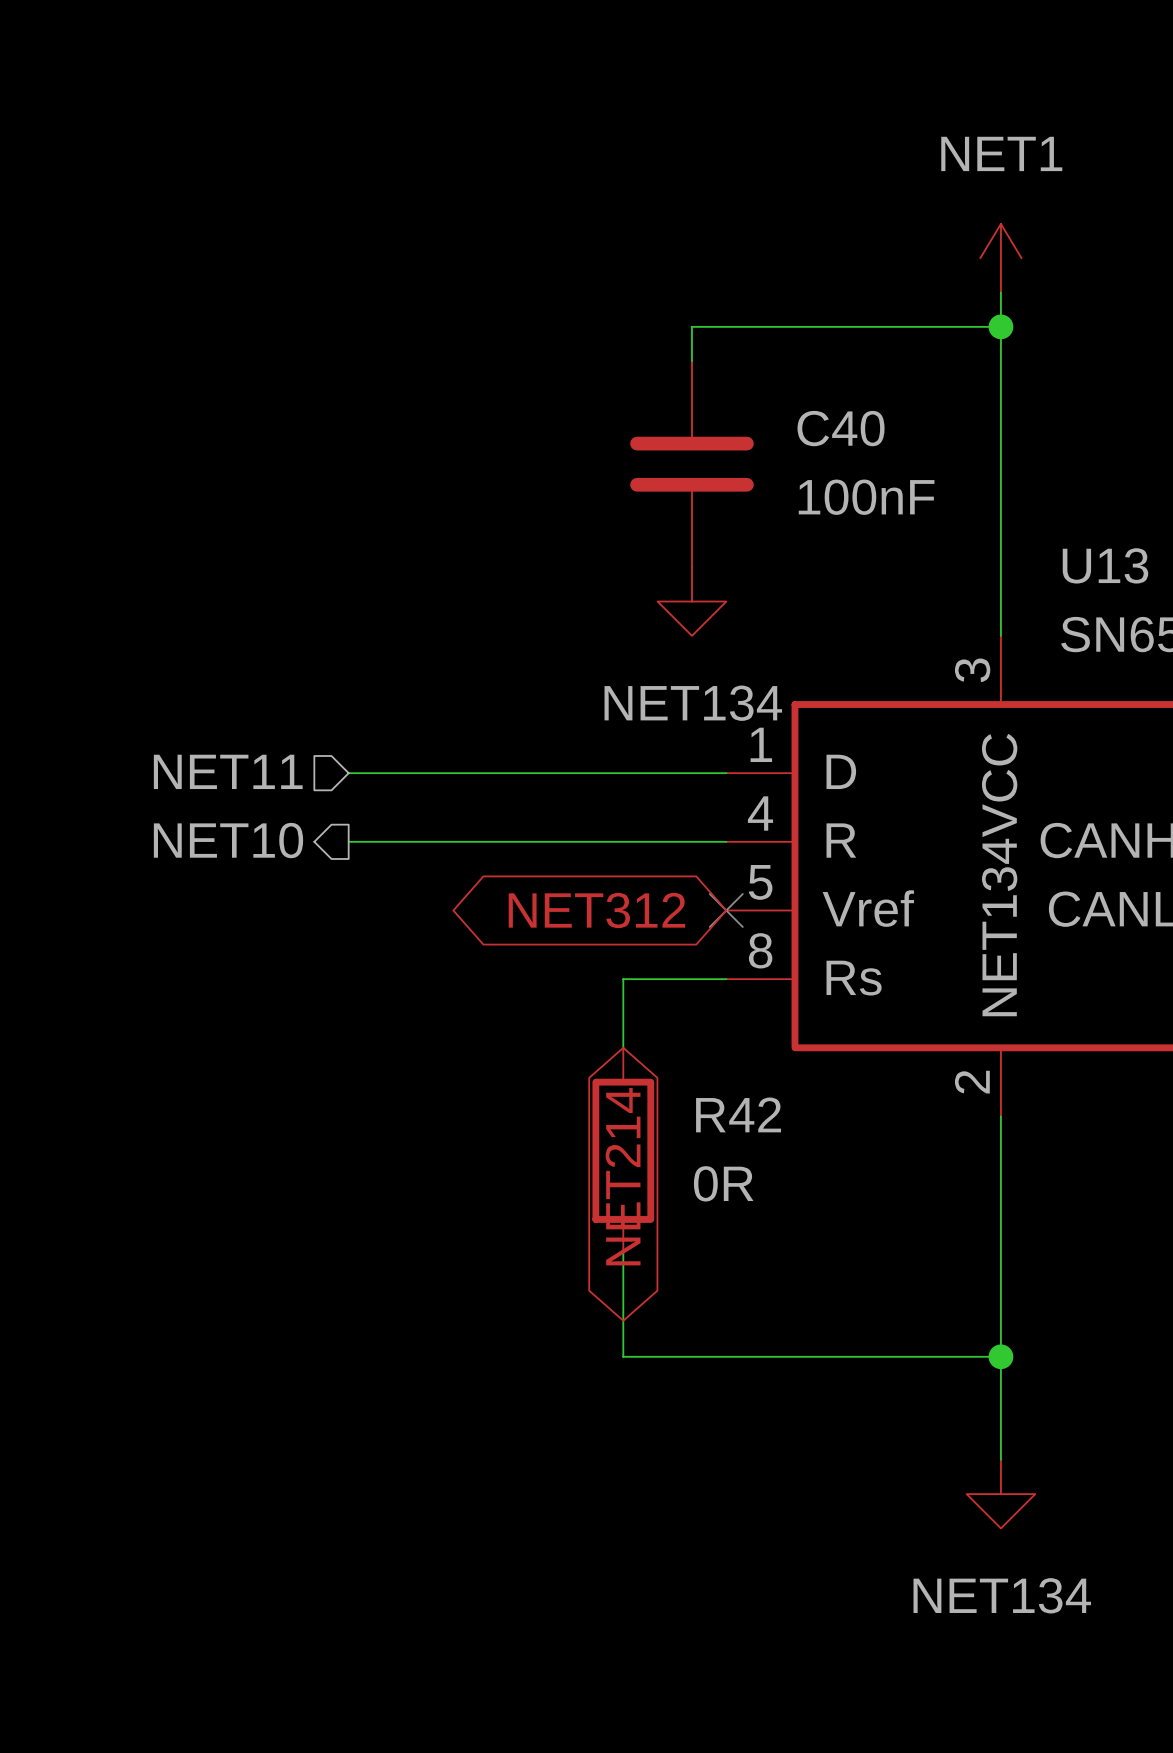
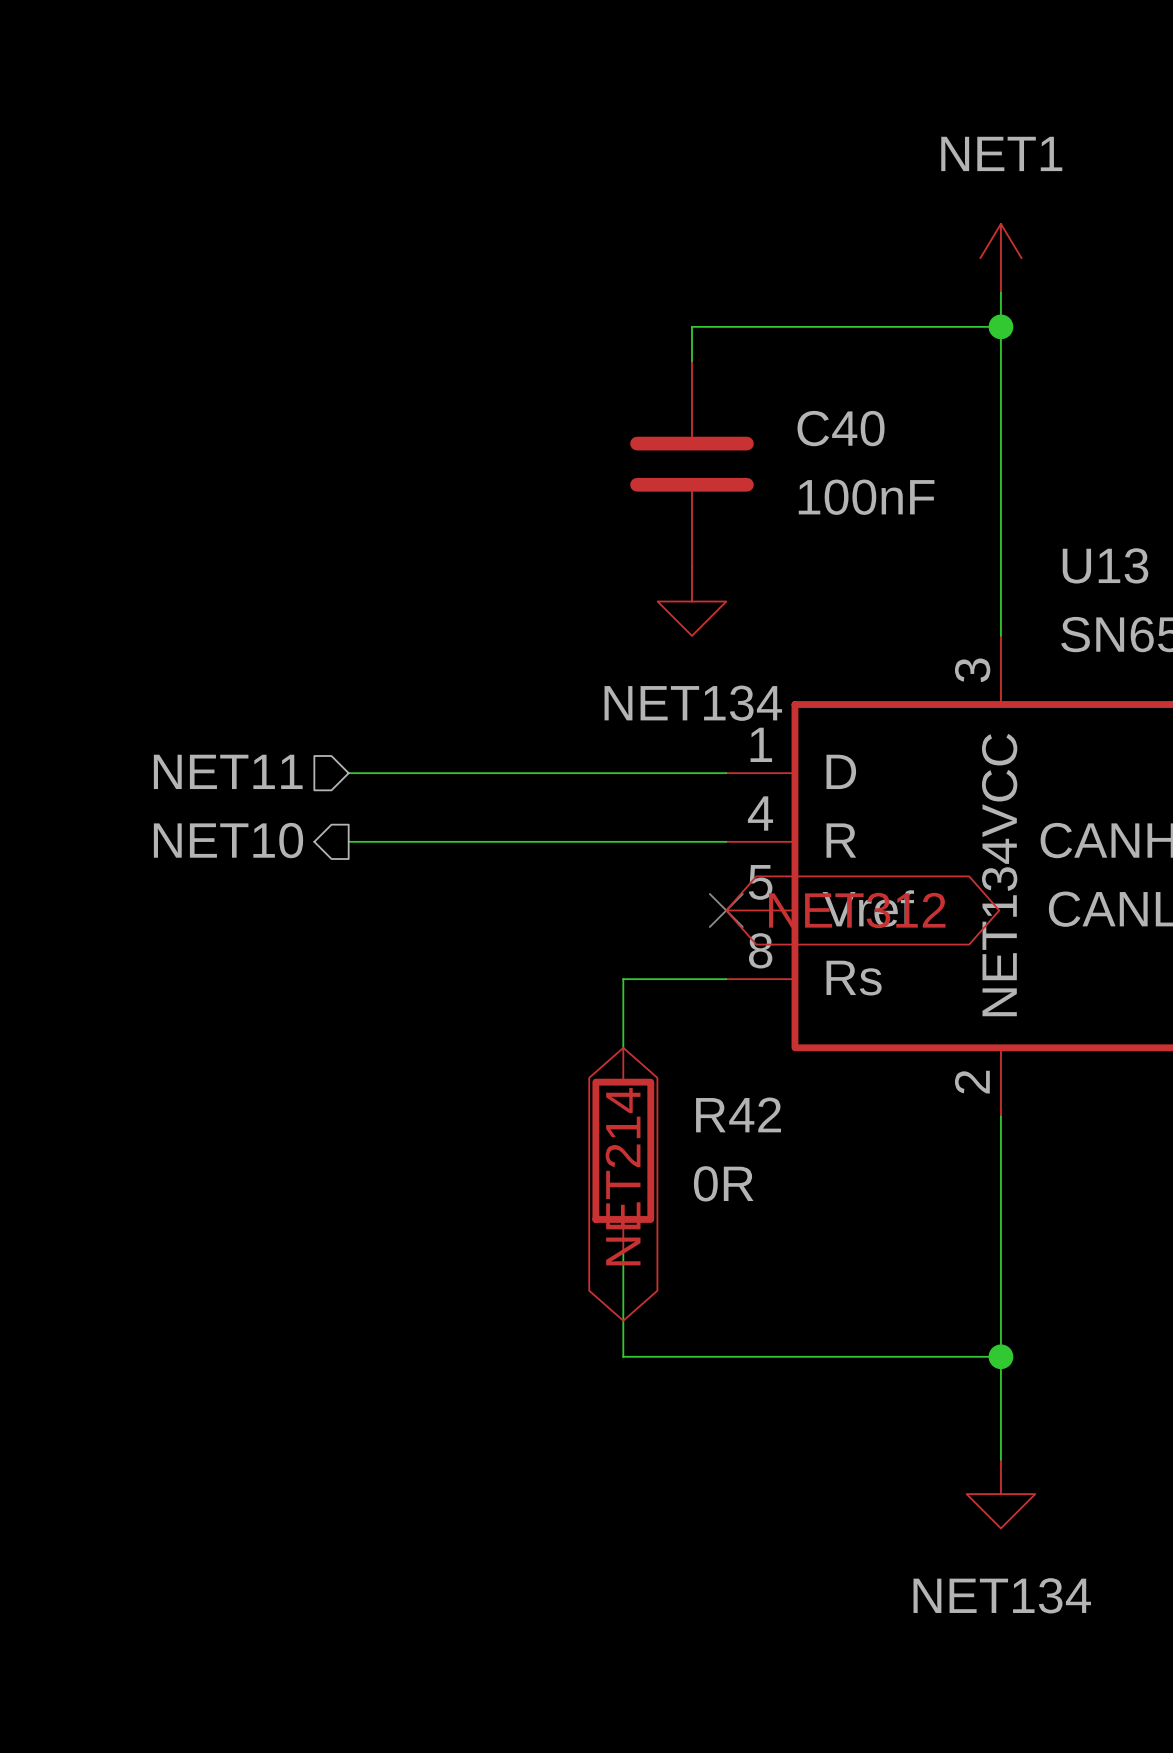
global label rotation: 0° (596, 910) -> 180° (857, 910)
global label position: NET312 (596, 910) -> NET312 (857, 910)

